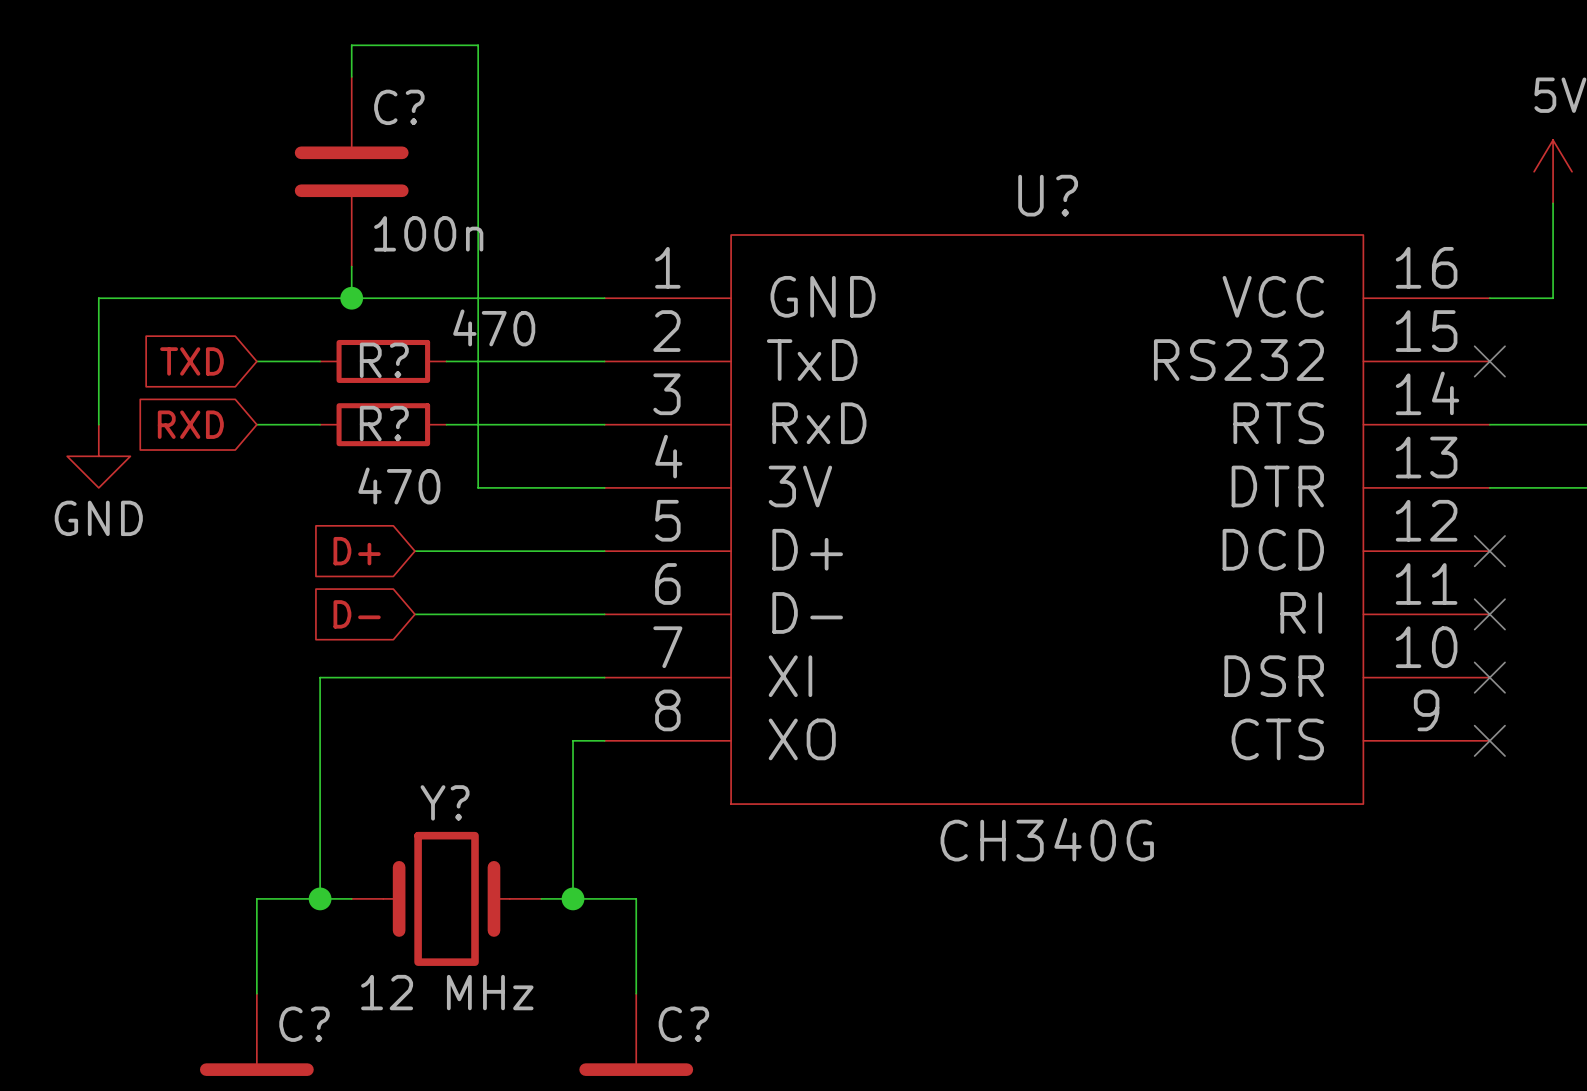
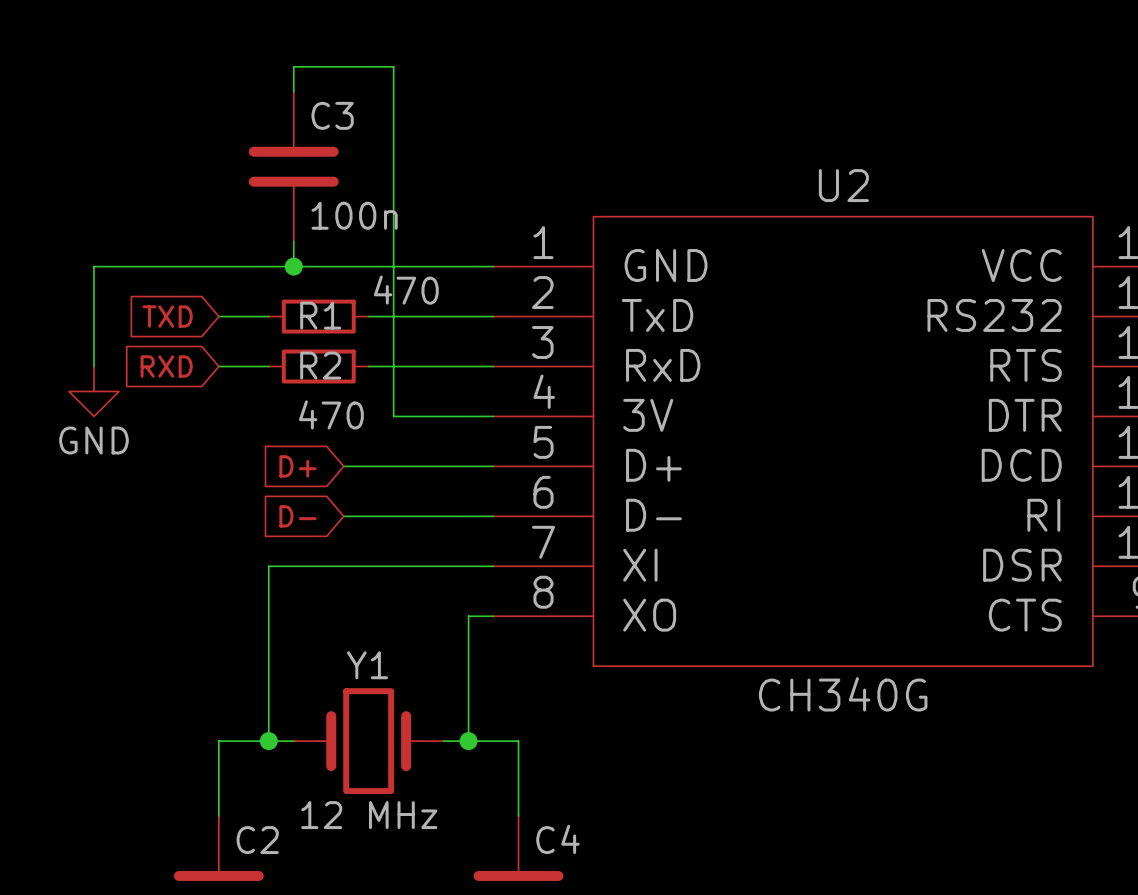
C? name: C? (399, 107) -> C3 (332, 115)
U? name: U? (1048, 195) -> U2 (843, 185)
R? name: R? (384, 360) -> R1 (320, 315)
R? name: R? (384, 423) -> R2 (320, 365)
Y? name: Y? (445, 802) -> Y1 (367, 665)
C? name: C? (304, 1024) -> C2 (257, 840)
C? name: C? (683, 1024) -> C4 (557, 839)

